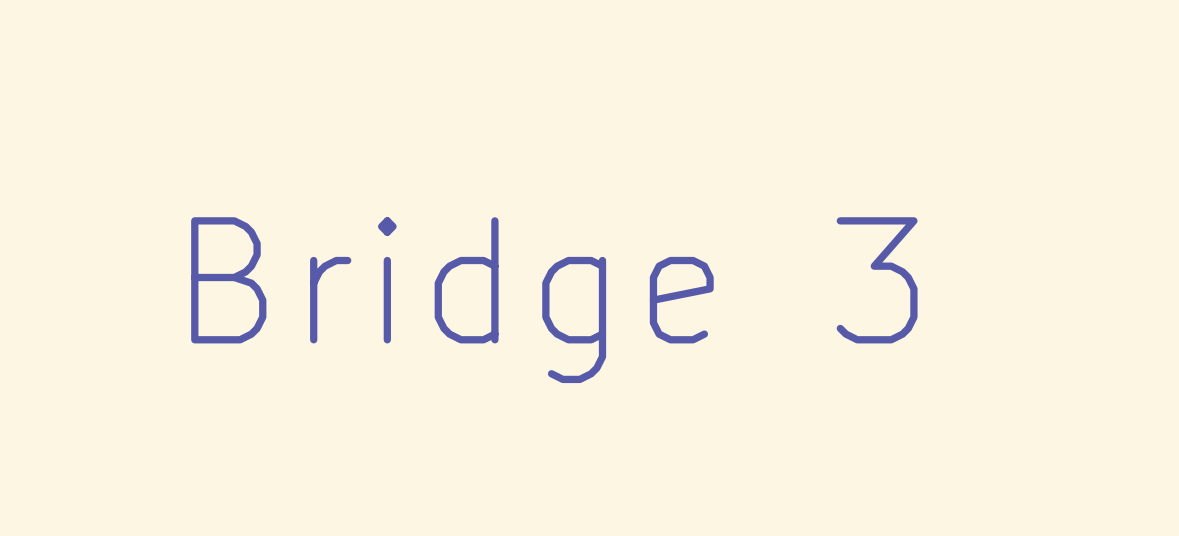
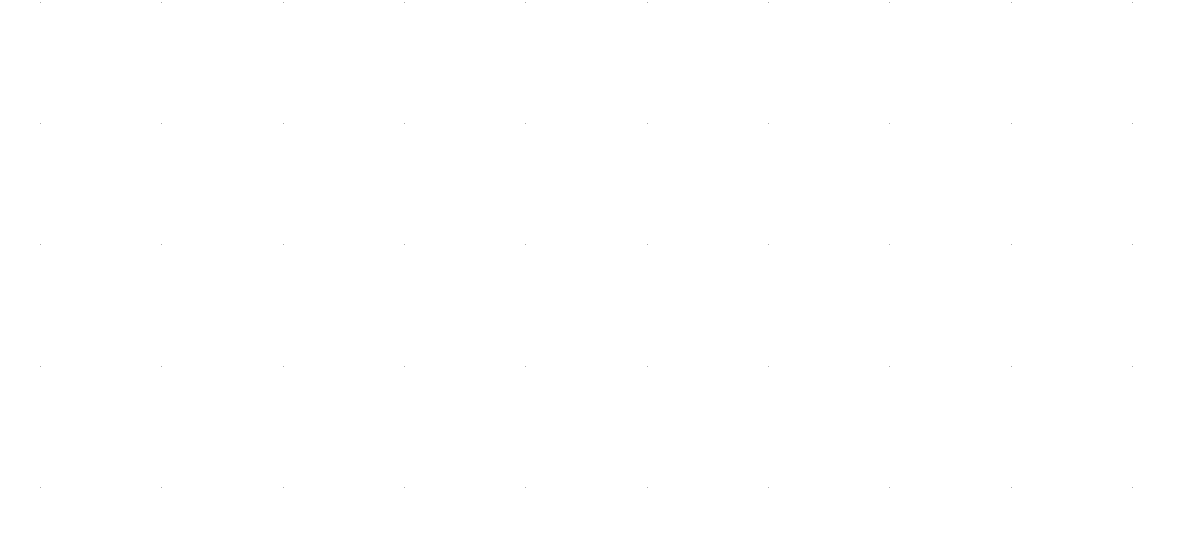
text: Bridge 3 (554, 300) -> none

